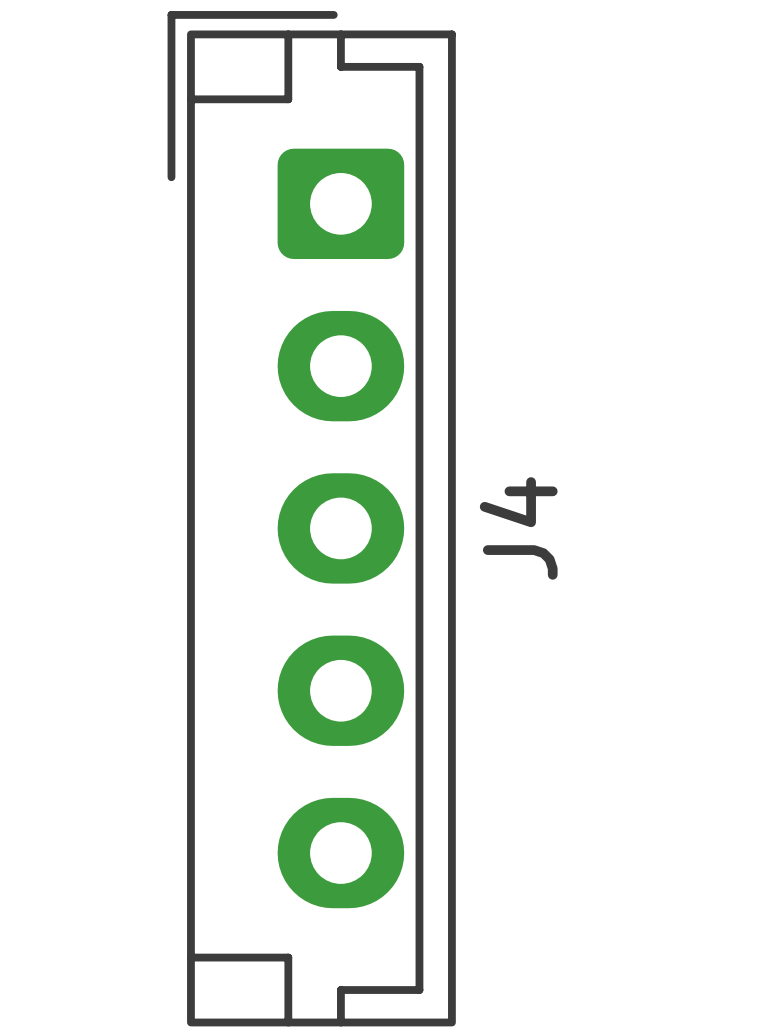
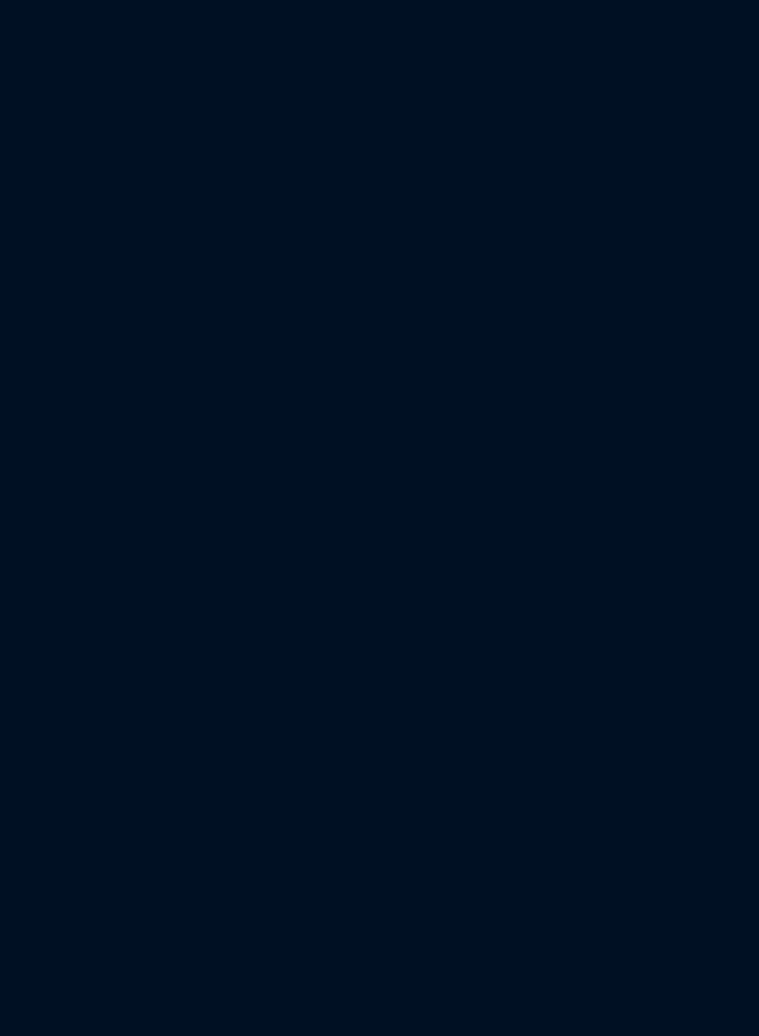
J4: (311, 518) -> none

